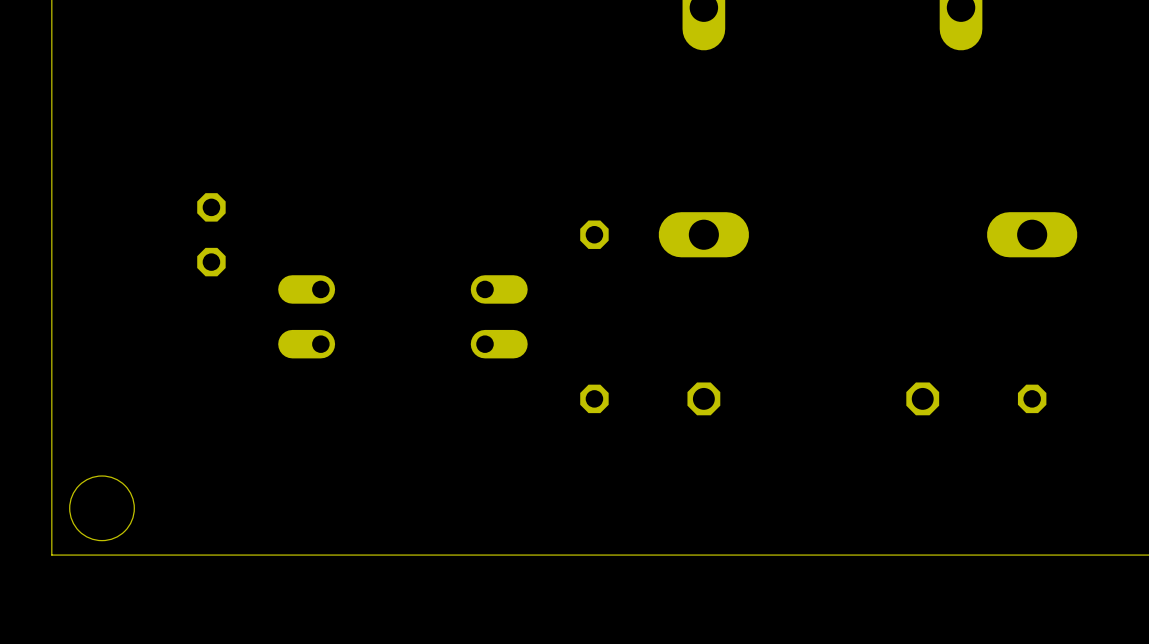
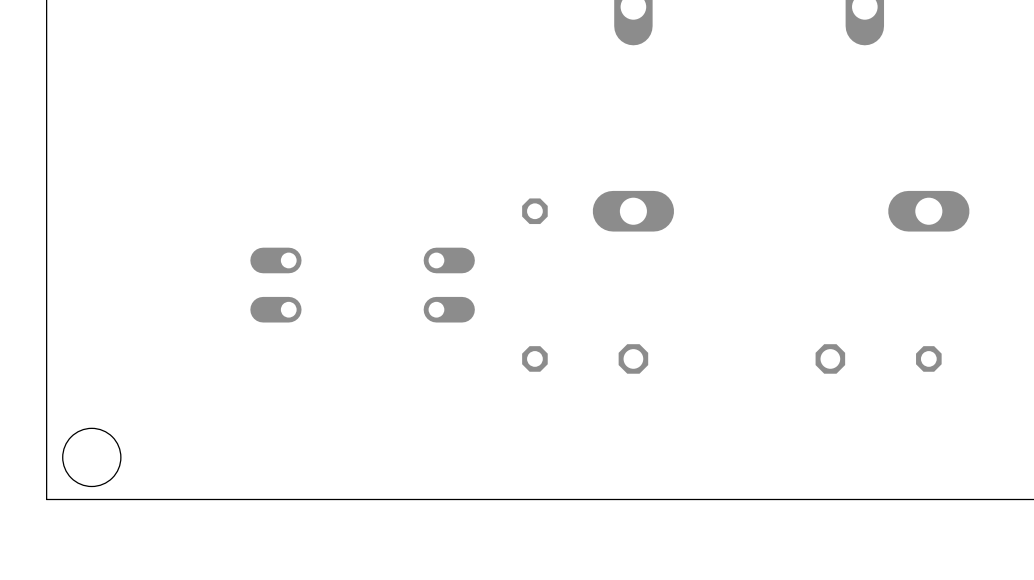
part: (211, 234) -> none

